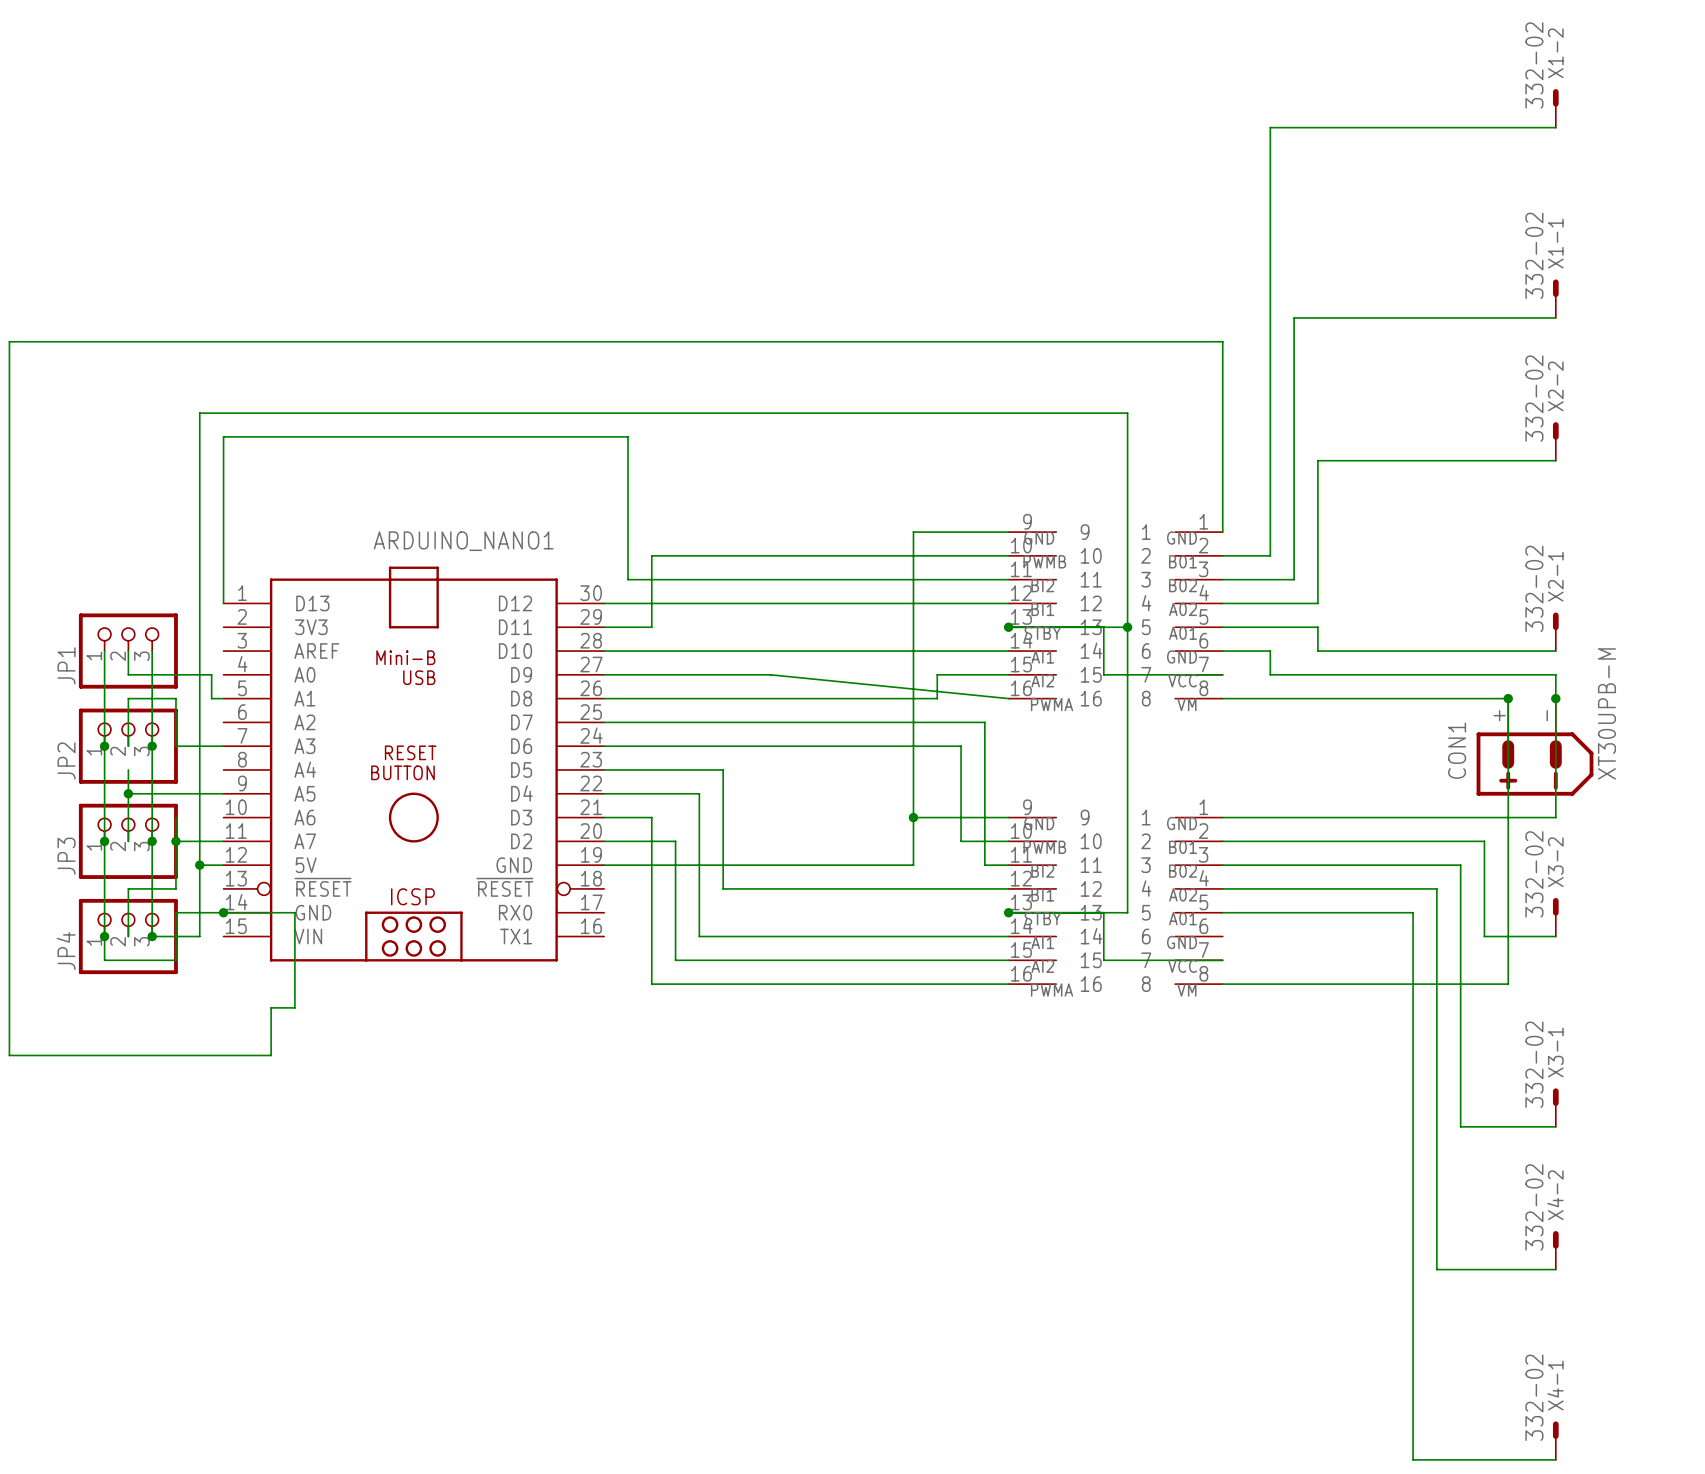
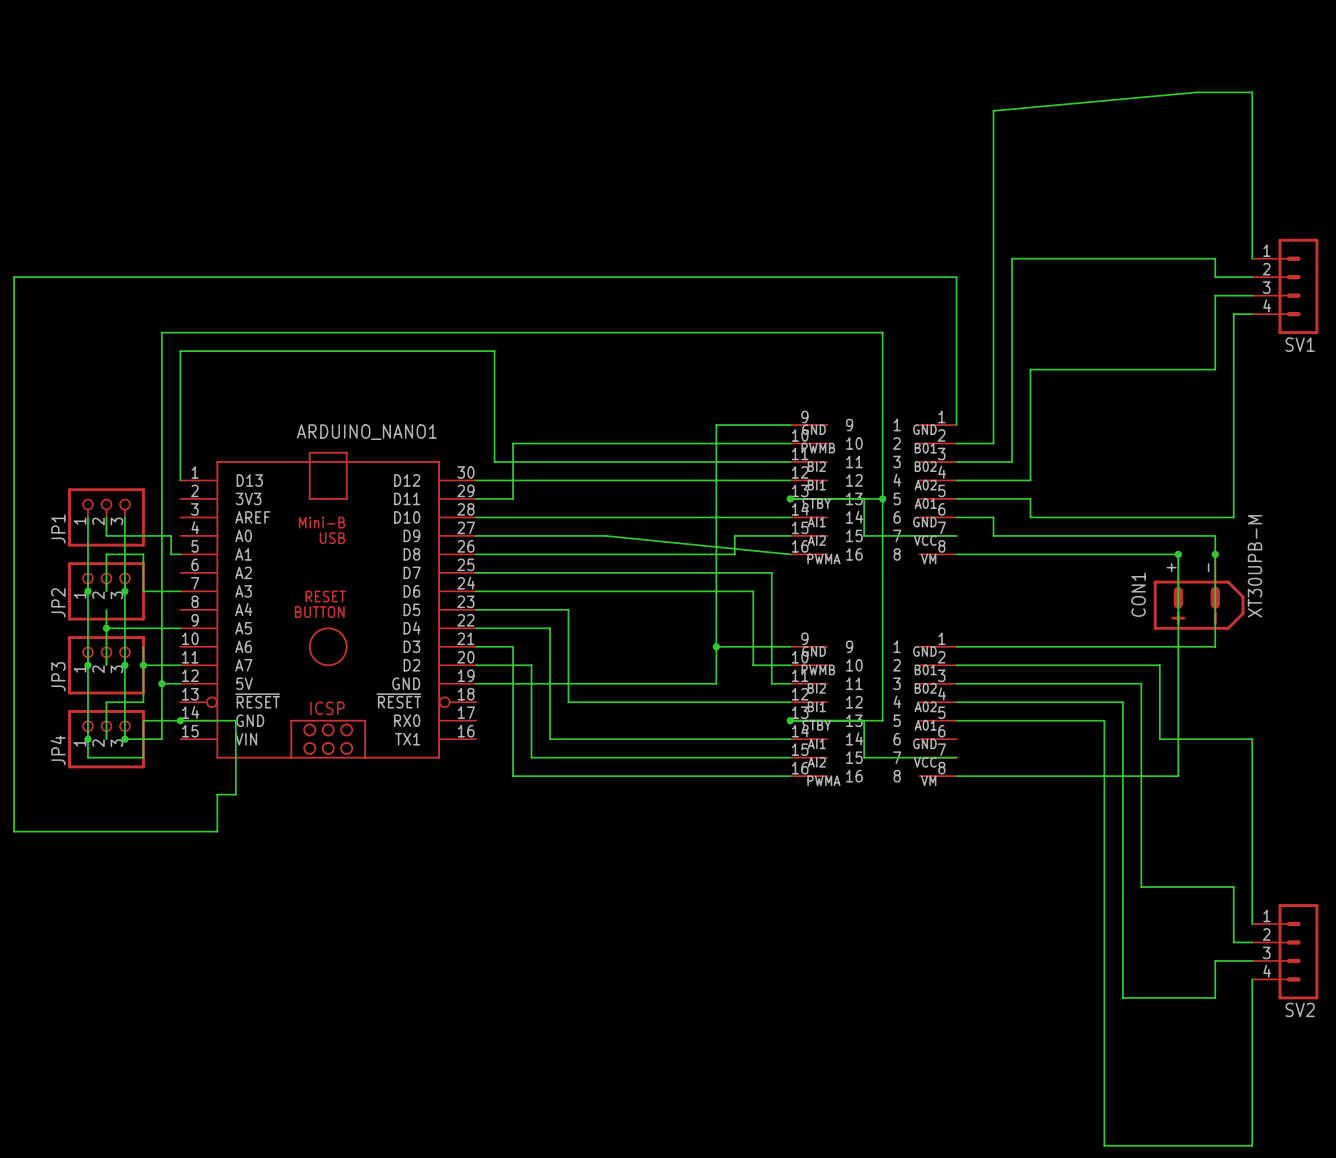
X1-2: 332-02 (1555, 108) -> none
wire: (1270, 127) (1555, 127) -> (993, 110) (1196, 92) (1252, 92) (1252, 258)
X1-1: 332-02 (1555, 298) -> none
wire: none -> (1215, 258) (1215, 277) (1252, 277)
SV1: none -> (1285, 286)
wire: none -> (1252, 295) (1215, 295) (1215, 369)
wire: none -> (1252, 314) (1233, 314) (1233, 517) (1215, 517)
X2-2: 332-02 (1555, 441) -> none
X2-1: 332-02 (1555, 631) -> none
X3-2: 332-02 (1555, 917) -> none
wire: none -> (1215, 739) (1252, 739) (1252, 923)
X3-1: 332-02 (1555, 1107) -> none
wire: none -> (1215, 887) (1233, 887) (1233, 942) (1252, 942)
SV2: none -> (1285, 951)
wire: none -> (1252, 960) (1215, 960) (1215, 997)
wire: none -> (1252, 979) (1252, 1145) (1215, 1145)
X4-2: 332-02 (1555, 1250) -> none
X4-1: 332-02 (1555, 1440) -> none

